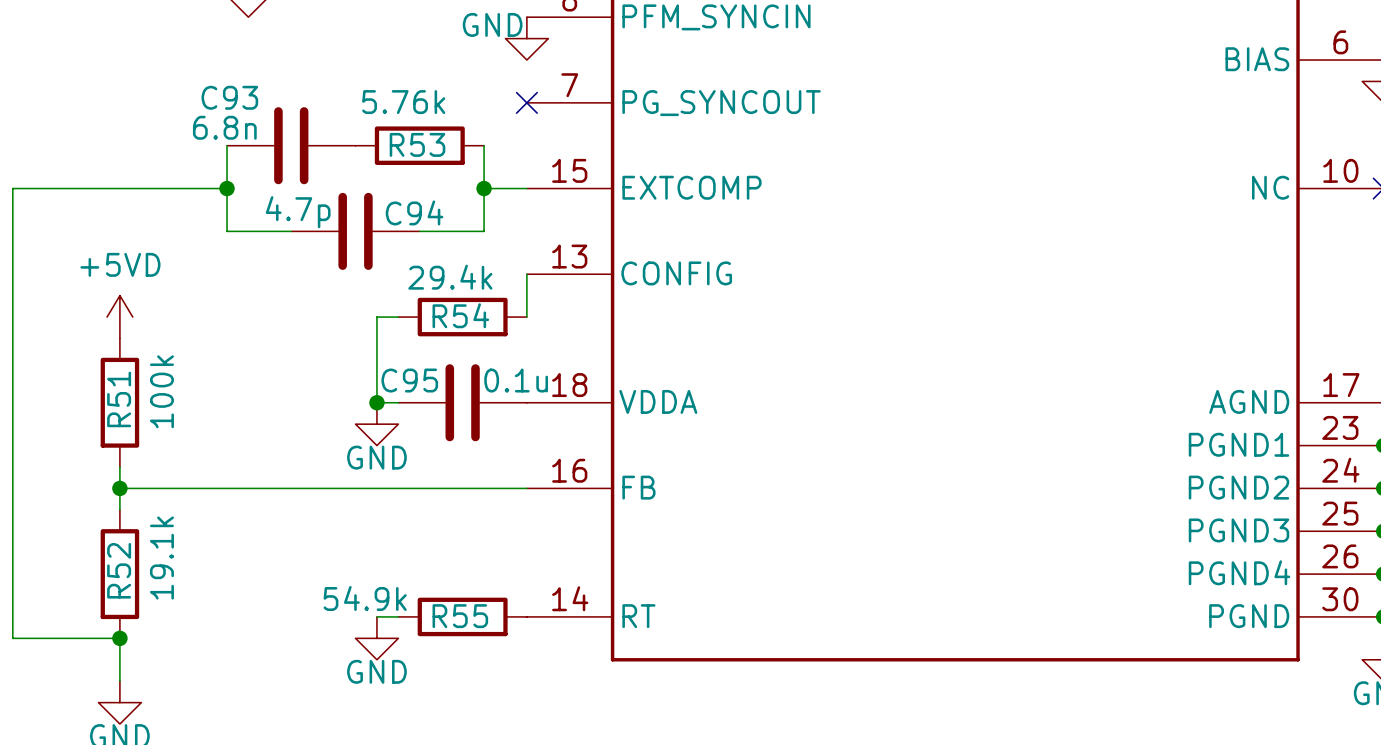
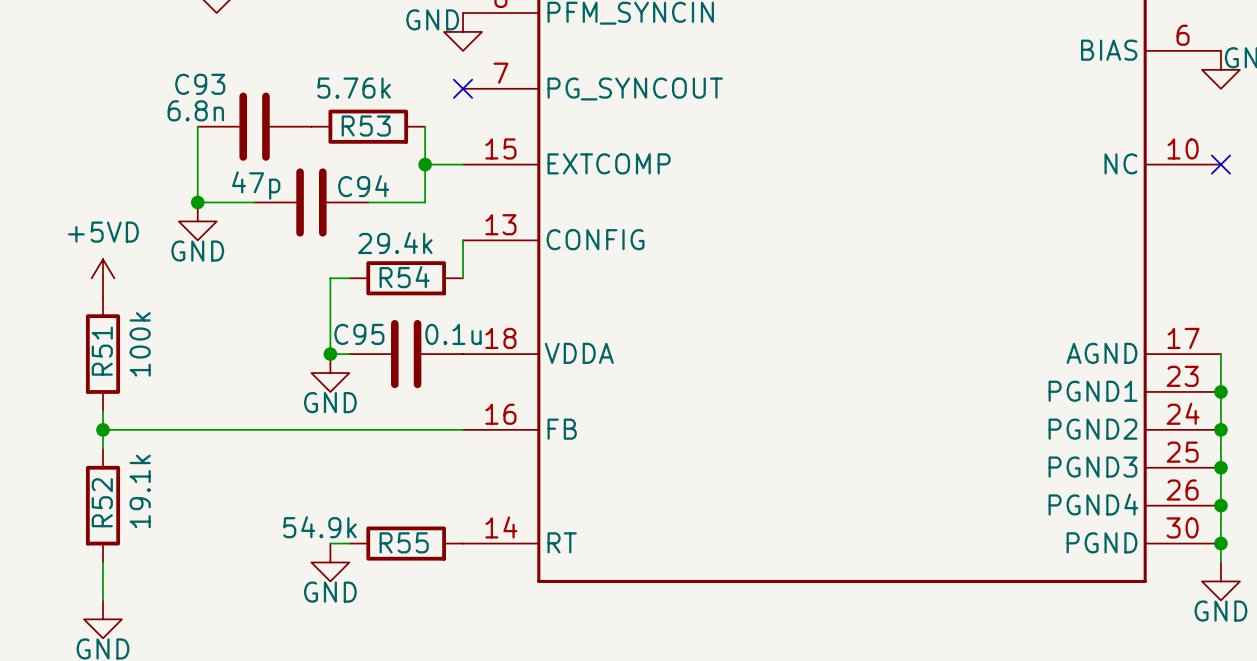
wire: (227, 188) (12, 188) (12, 638) (119, 638) -> none
junction position: (227, 188) -> (197, 202)
C94 value: 4.7p (298, 212) -> 47p (256, 185)
power symbol: none -> GND (197, 221)
junction: (119, 638) -> none

